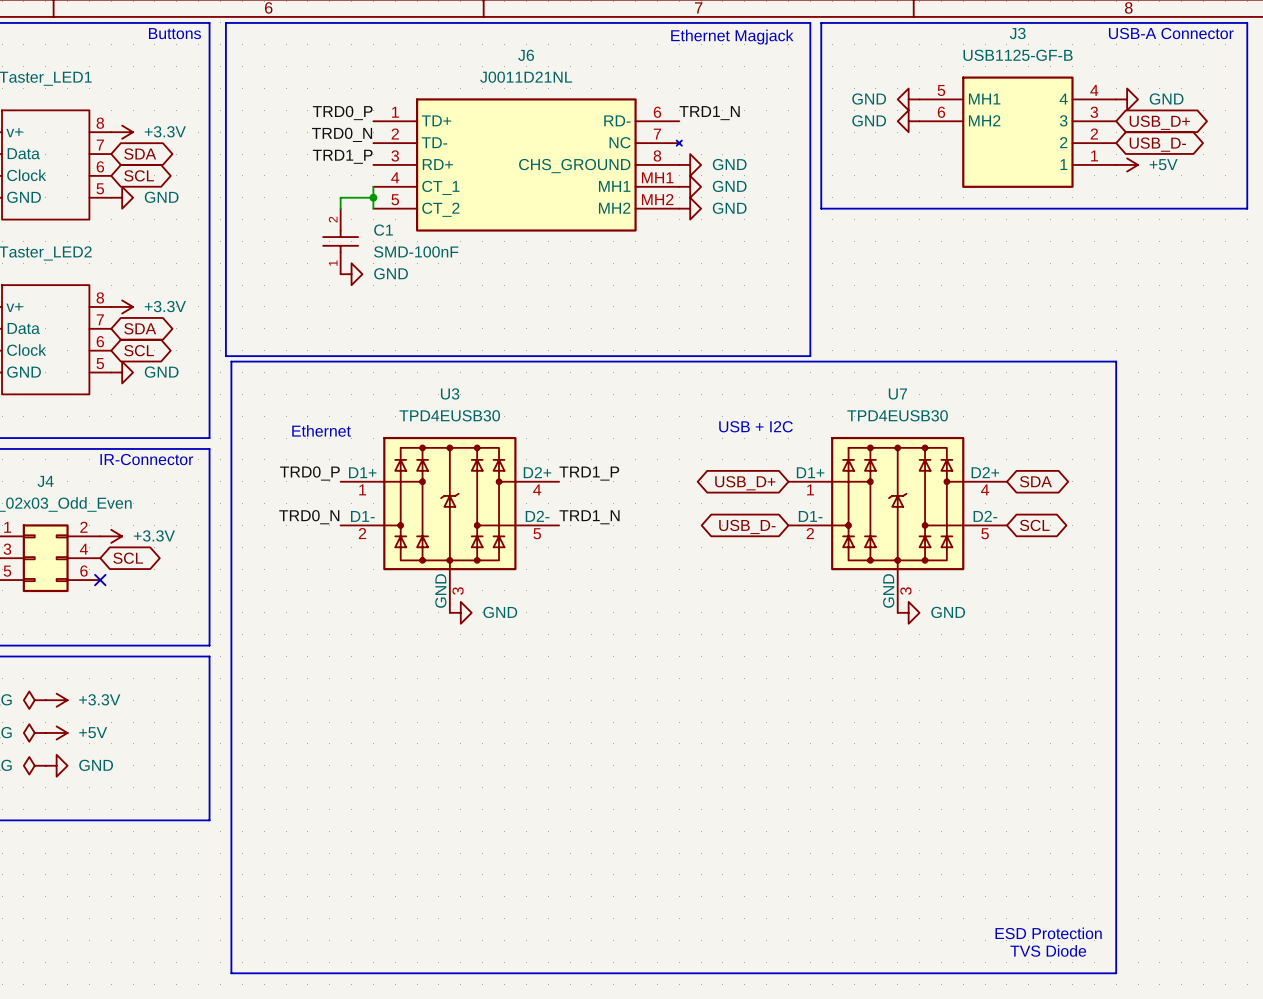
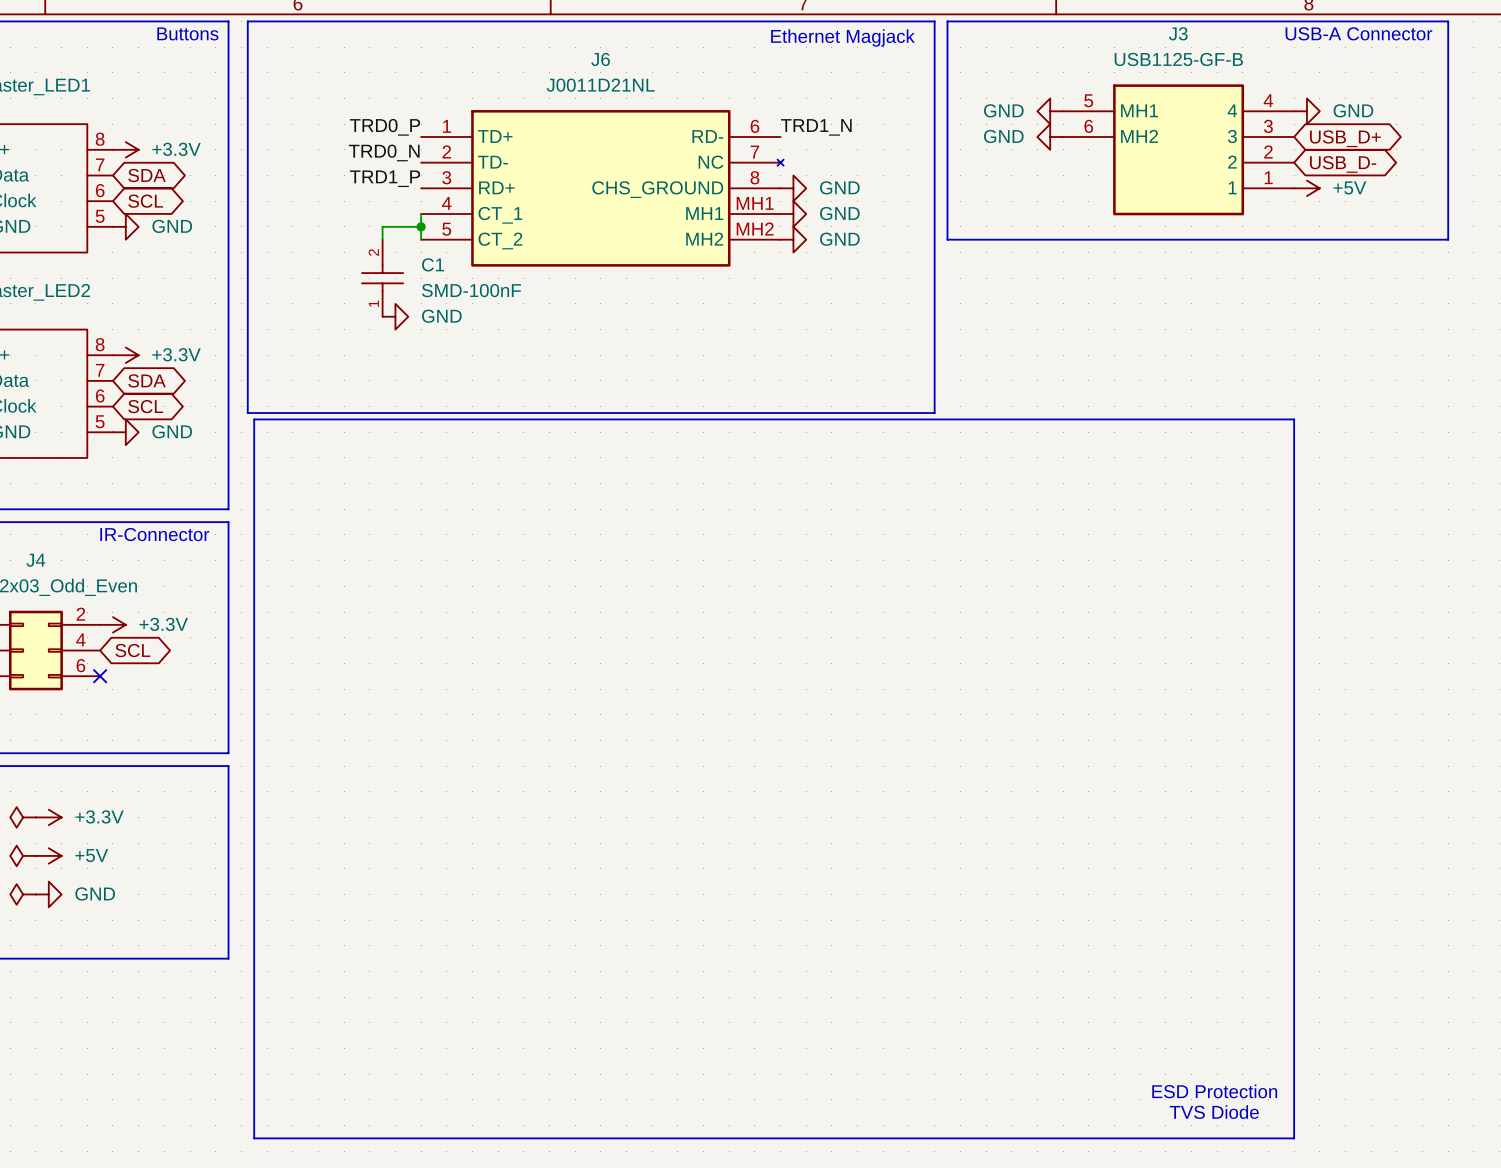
text: USB + I2C (756, 426) -> none
text: Ethernet (321, 430) -> none
label: TRD0_P (309, 473) -> none
label: TRD1_P (589, 473) -> none
global label: SDA (1035, 481) -> none
global label: USB_D+ (745, 483) -> none
label: TRD0_N (309, 517) -> none
label: TRD1_N (589, 517) -> none
U3: TPD4EUSB30 (449, 524) -> none
U7: TPD4EUSB30 (897, 524) -> none
global label: SCL (1034, 525) -> none
global label: USB_D- (747, 526) -> none
power symbol: GND (460, 612) -> none
power symbol: GND (908, 612) -> none

